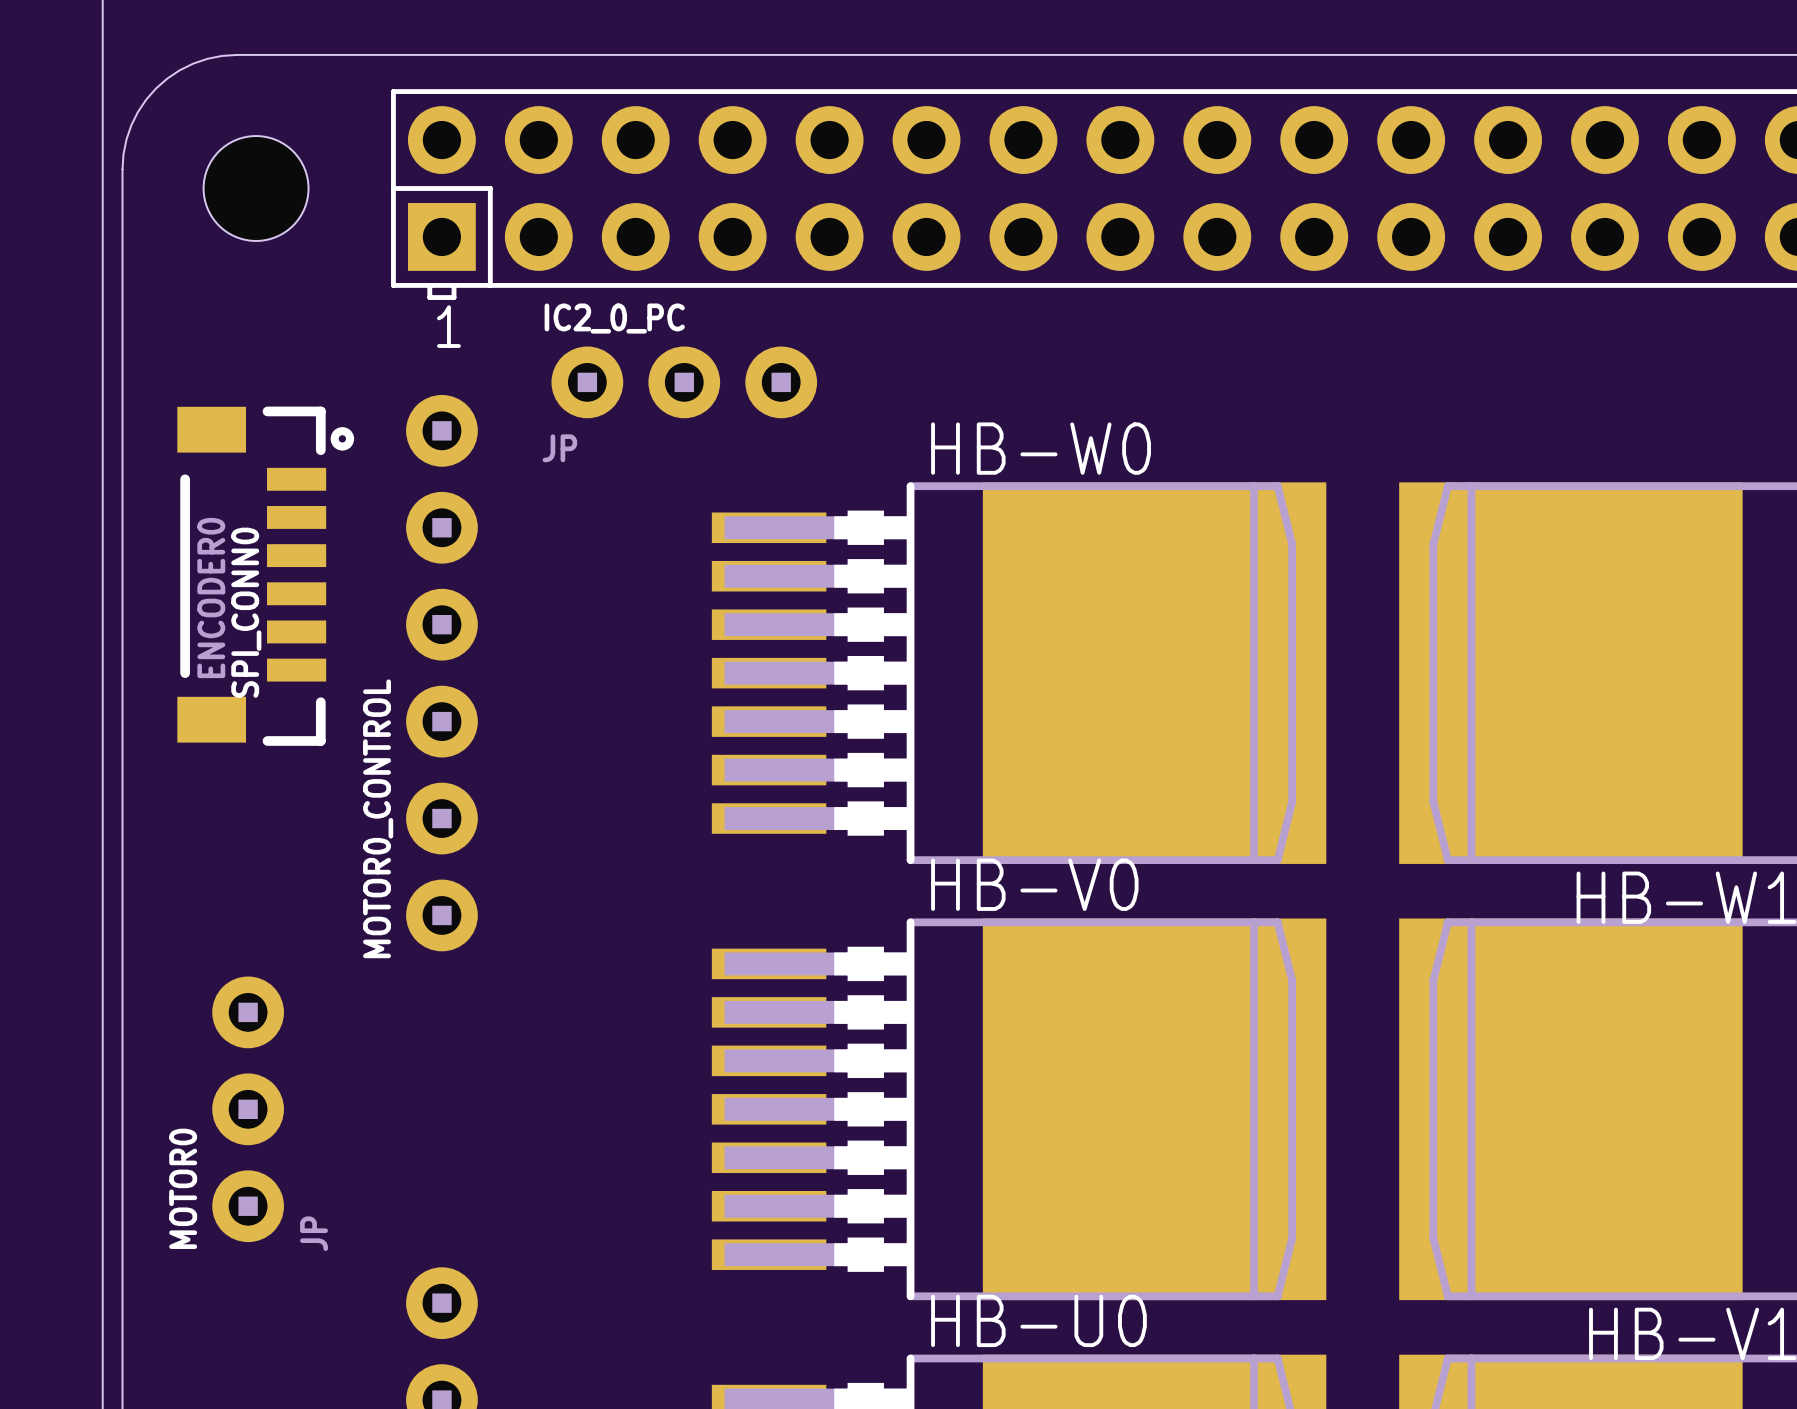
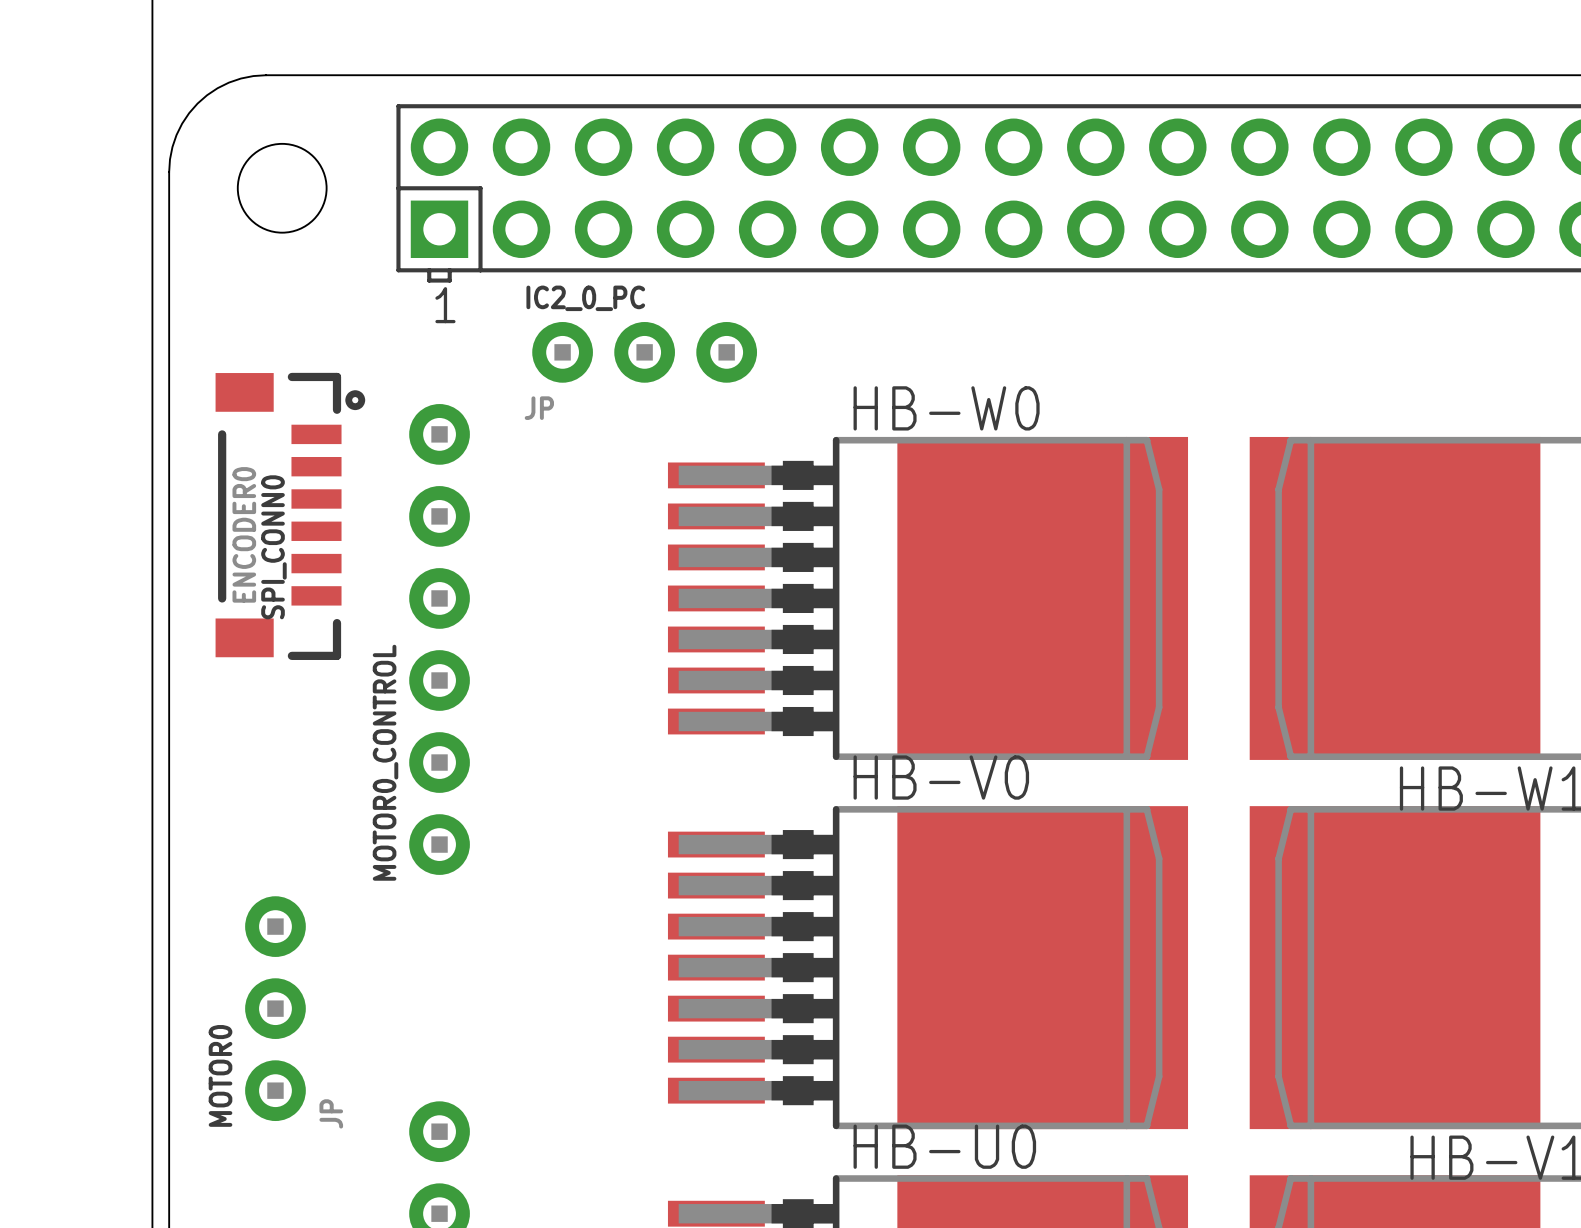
MOTOR0_CONTROL position: (441, 673) -> (439, 639)
MOTOR0 position: (248, 1109) -> (275, 1008)

